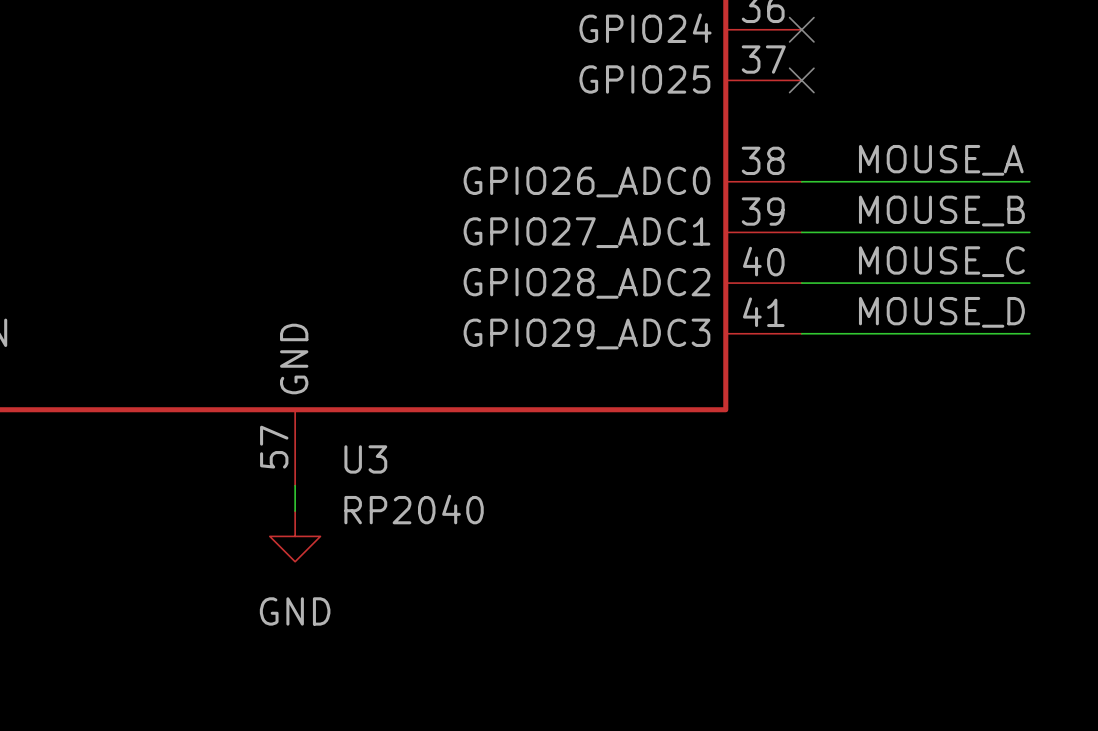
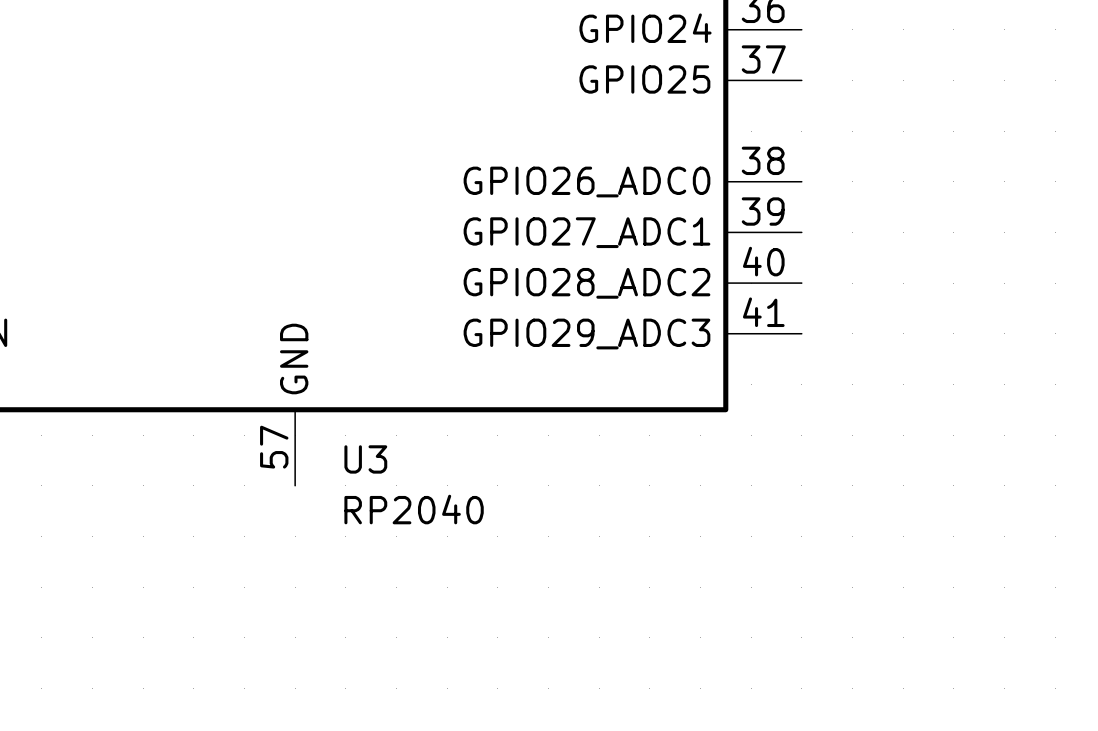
no-connect mark: (801, 29) -> none
no-connect mark: (801, 80) -> none
label: MOUSE_A (941, 160) -> none
wire: (801, 181) (1029, 181) -> none
label: MOUSE_B (941, 211) -> none
wire: (801, 232) (1029, 232) -> none
label: MOUSE_C (941, 261) -> none
wire: (801, 283) (1029, 283) -> none
label: MOUSE_D (941, 312) -> none
wire: (801, 333) (1029, 333) -> none
wire: (295, 485) (295, 511) -> none
power symbol: GND (295, 536) -> none

